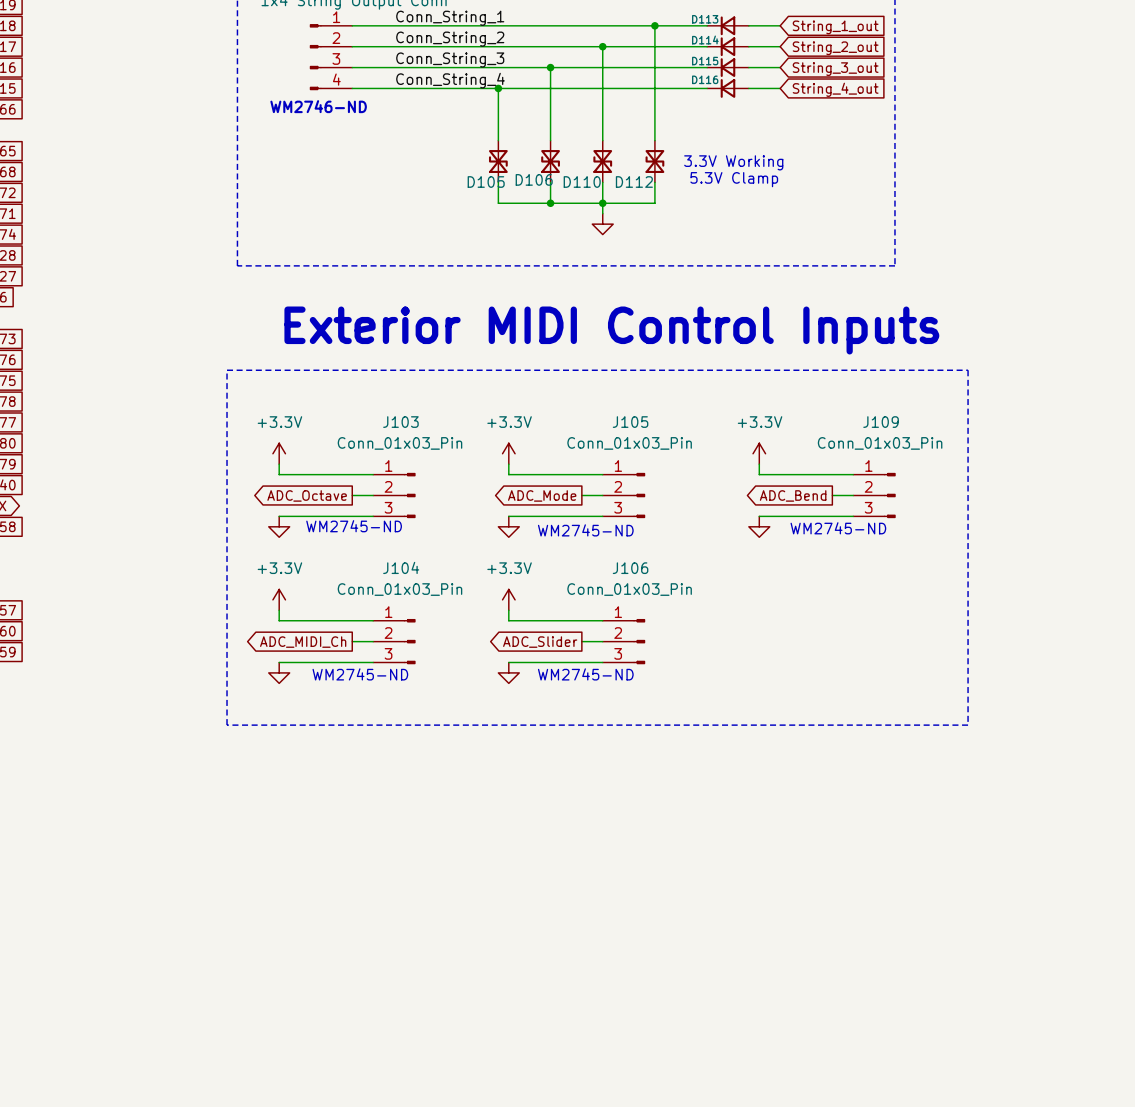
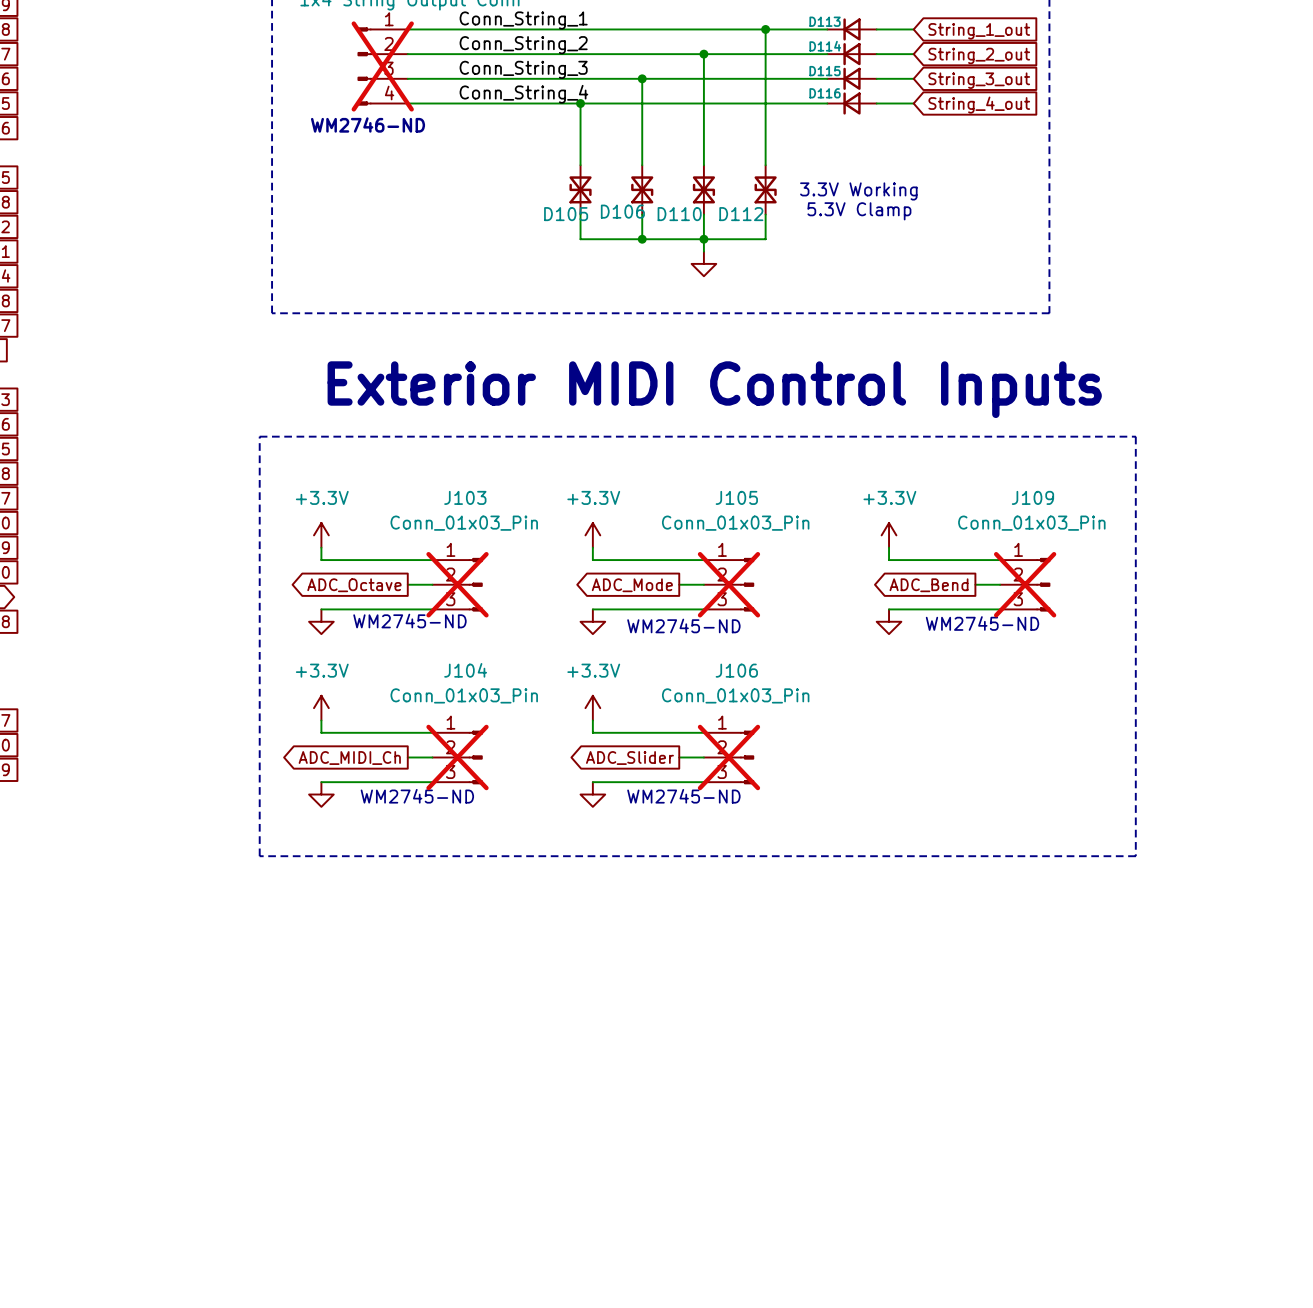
part do-not-place cross: none -> (382, 66)
J103 do-not-place cross: none -> (457, 584)
J105 do-not-place cross: none -> (728, 584)
J109 do-not-place cross: none -> (1025, 584)
J104 do-not-place cross: none -> (457, 757)
J106 do-not-place cross: none -> (728, 757)

